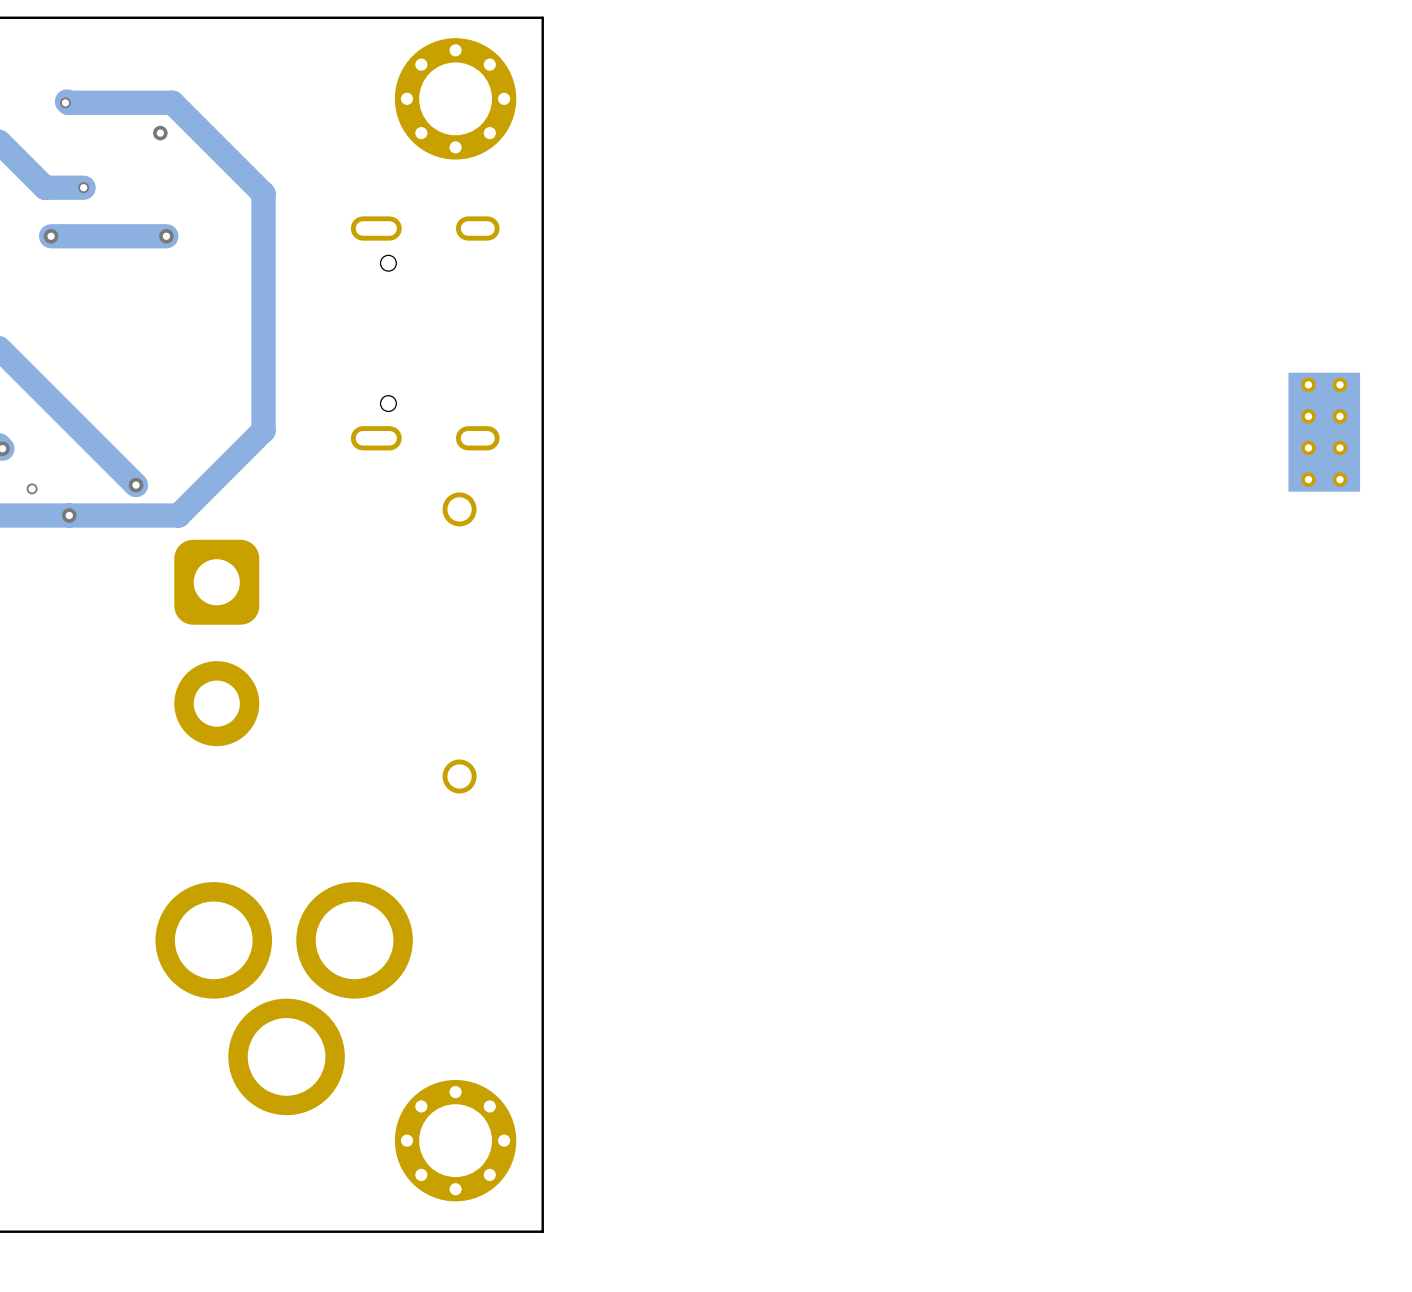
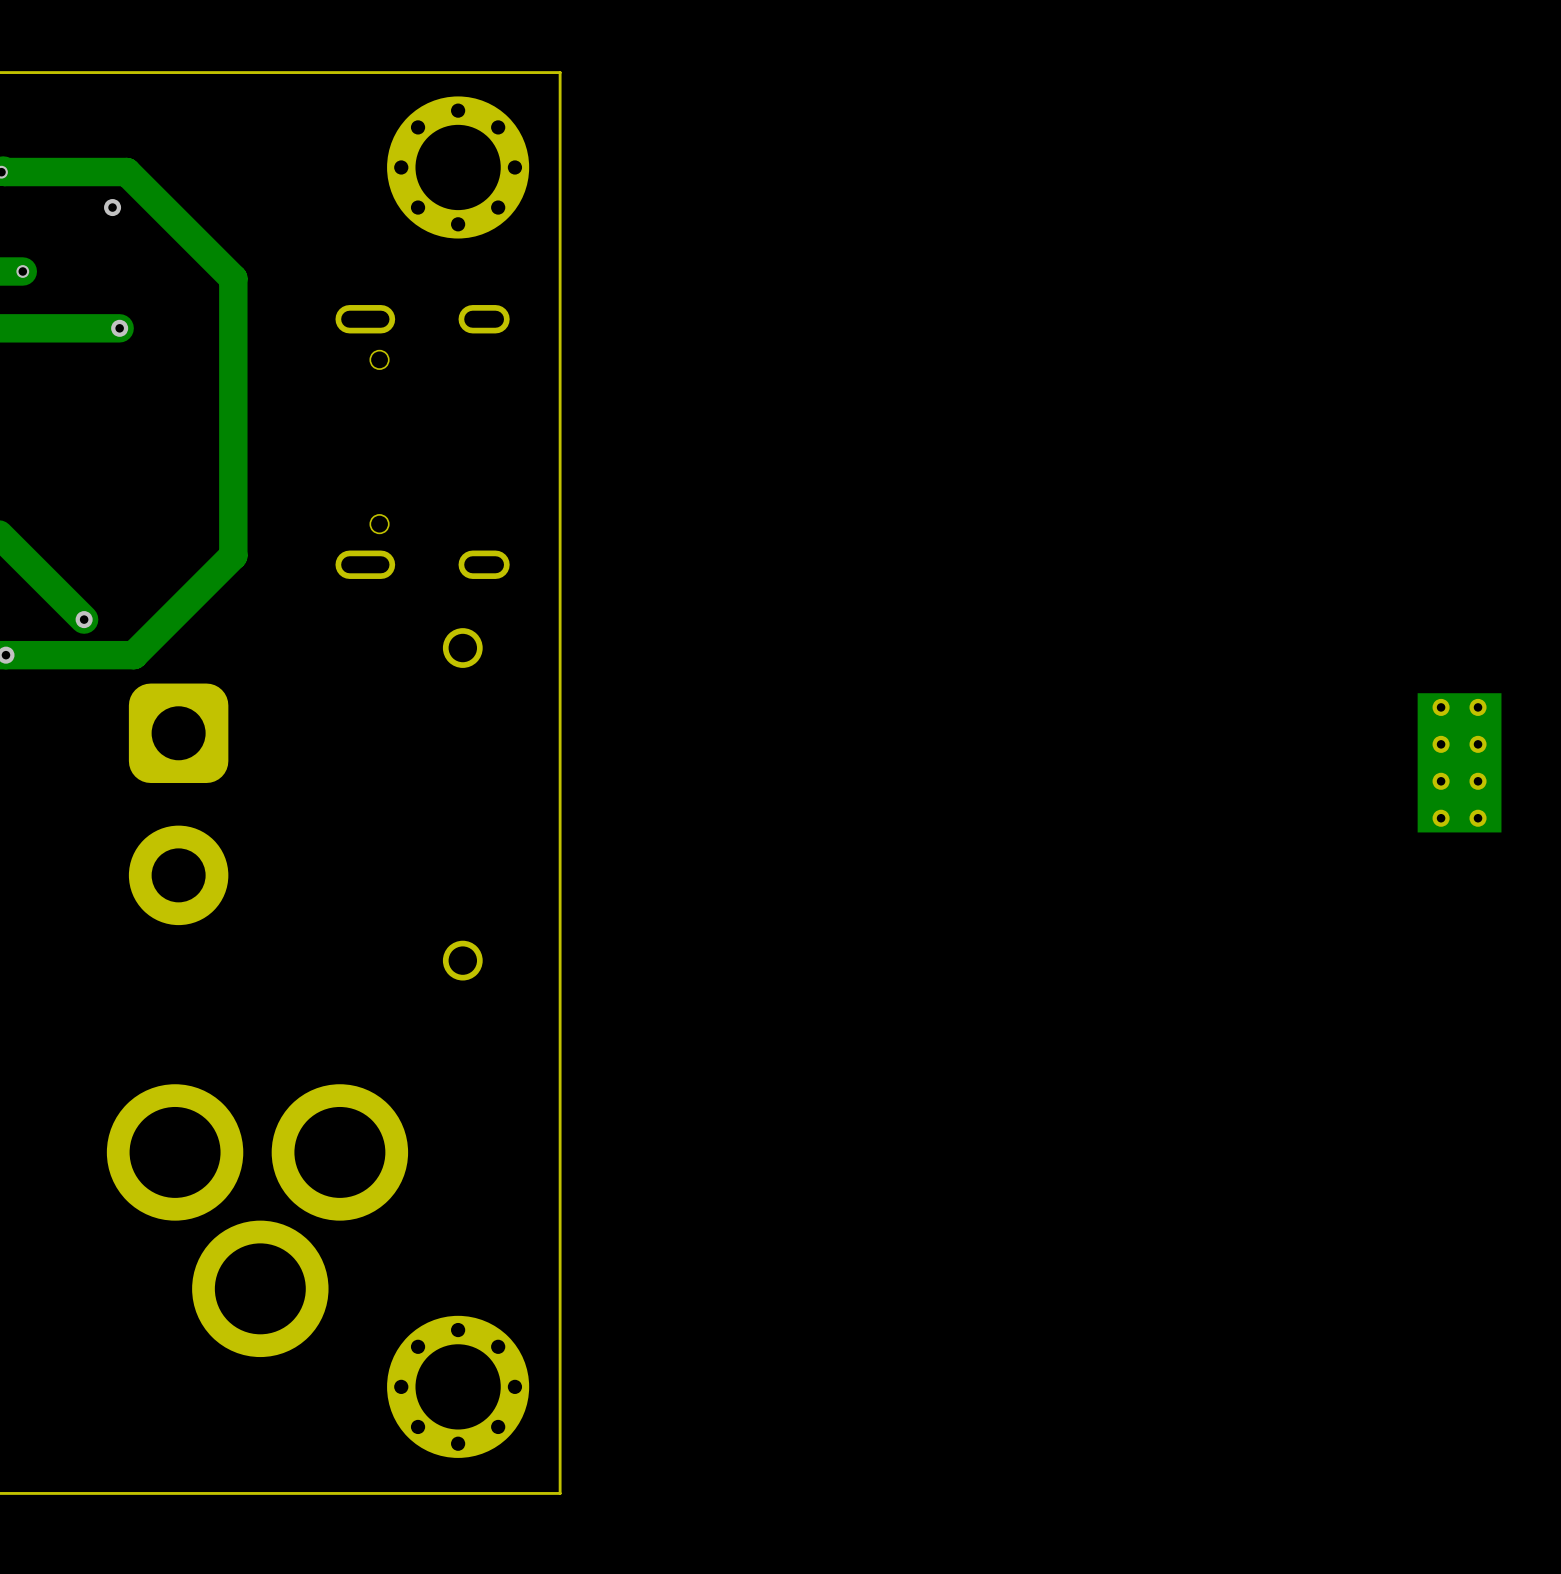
part position: (1324, 432) -> (1459, 762)

